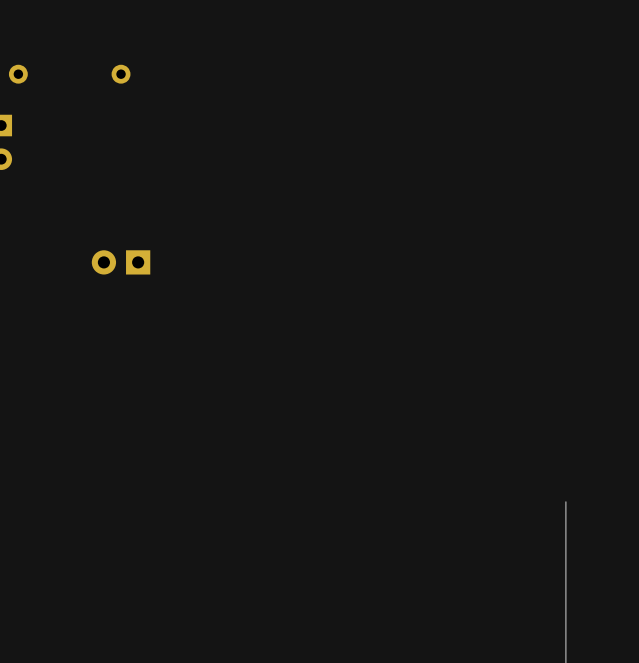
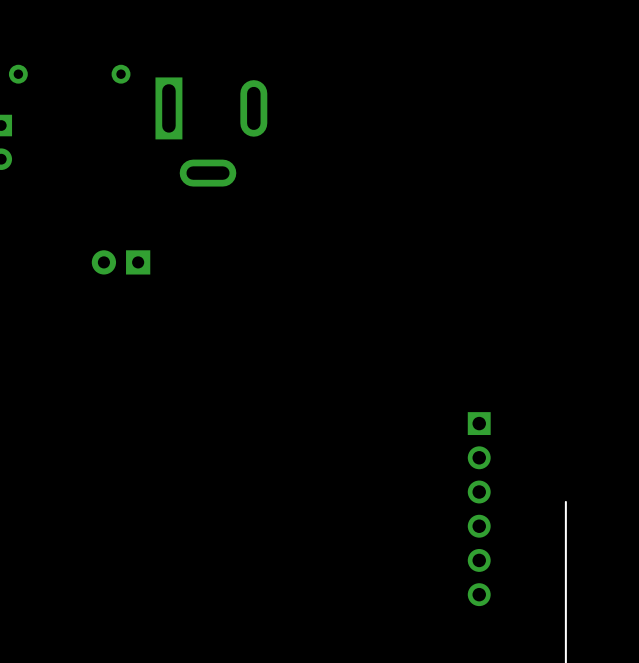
part: none -> (211, 131)
part: none -> (479, 509)

